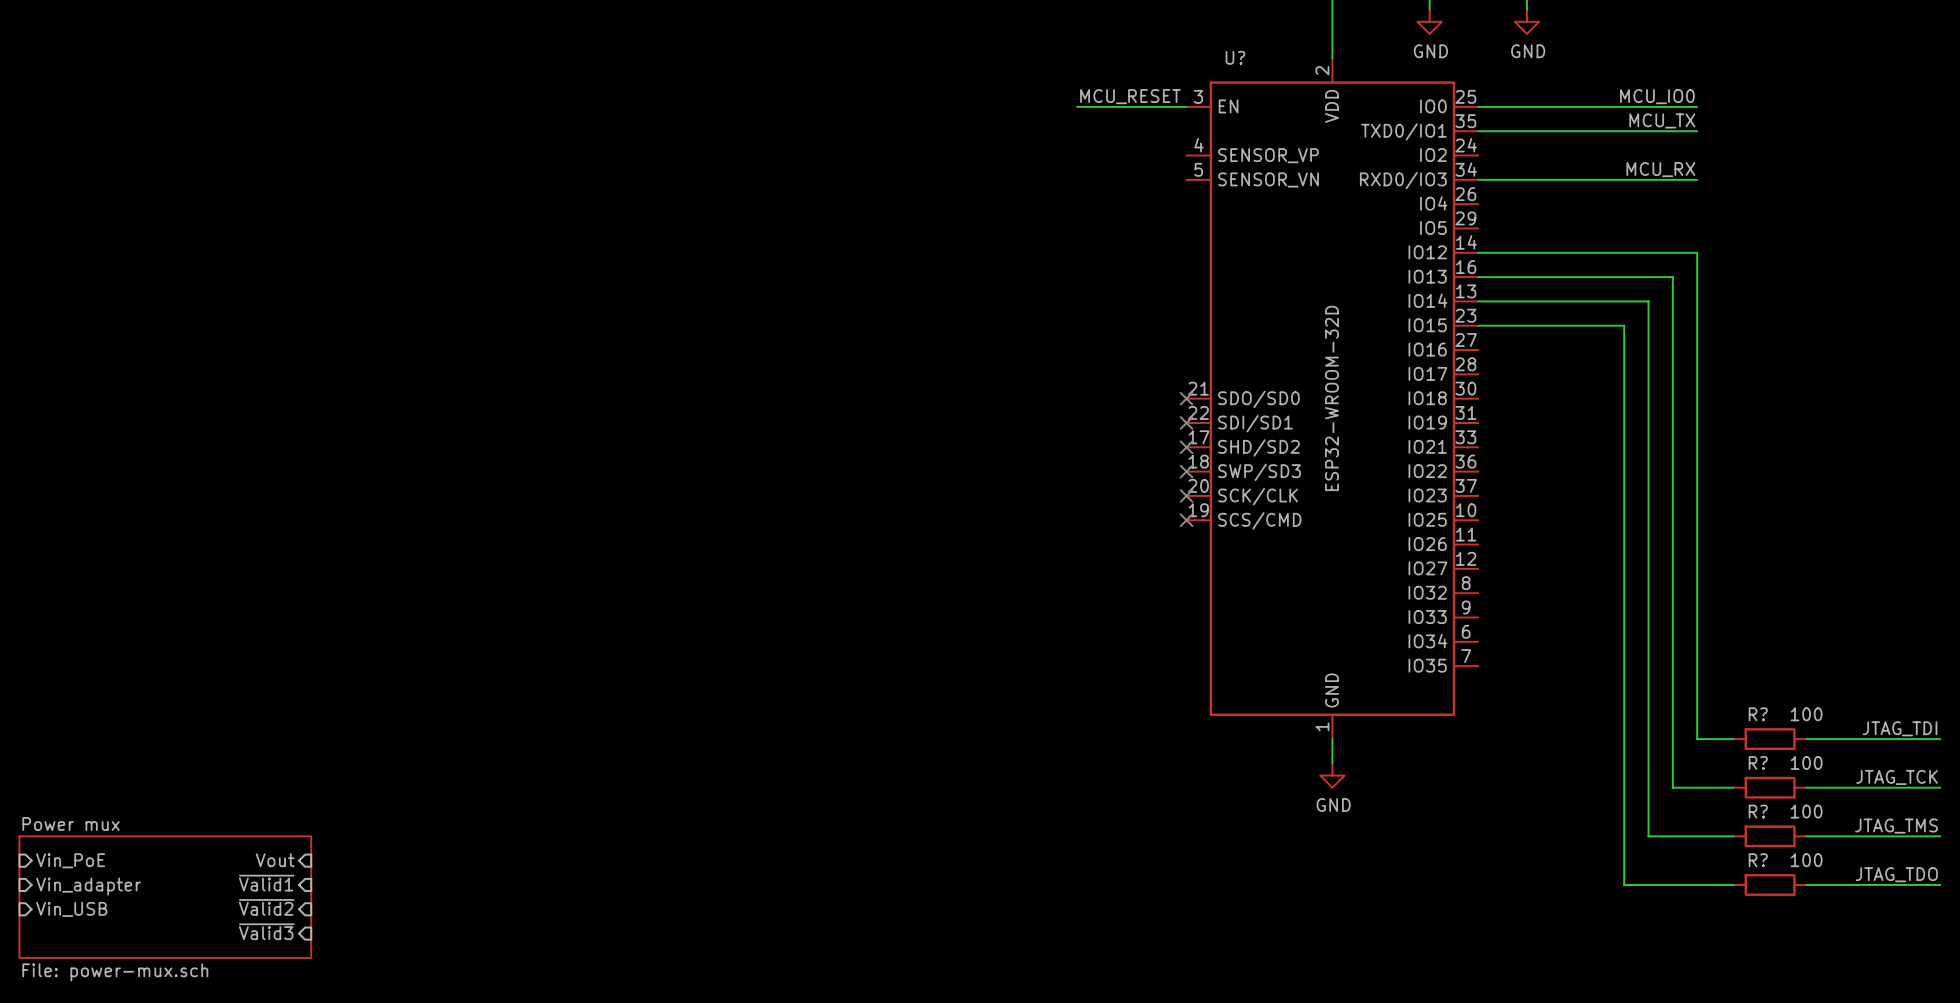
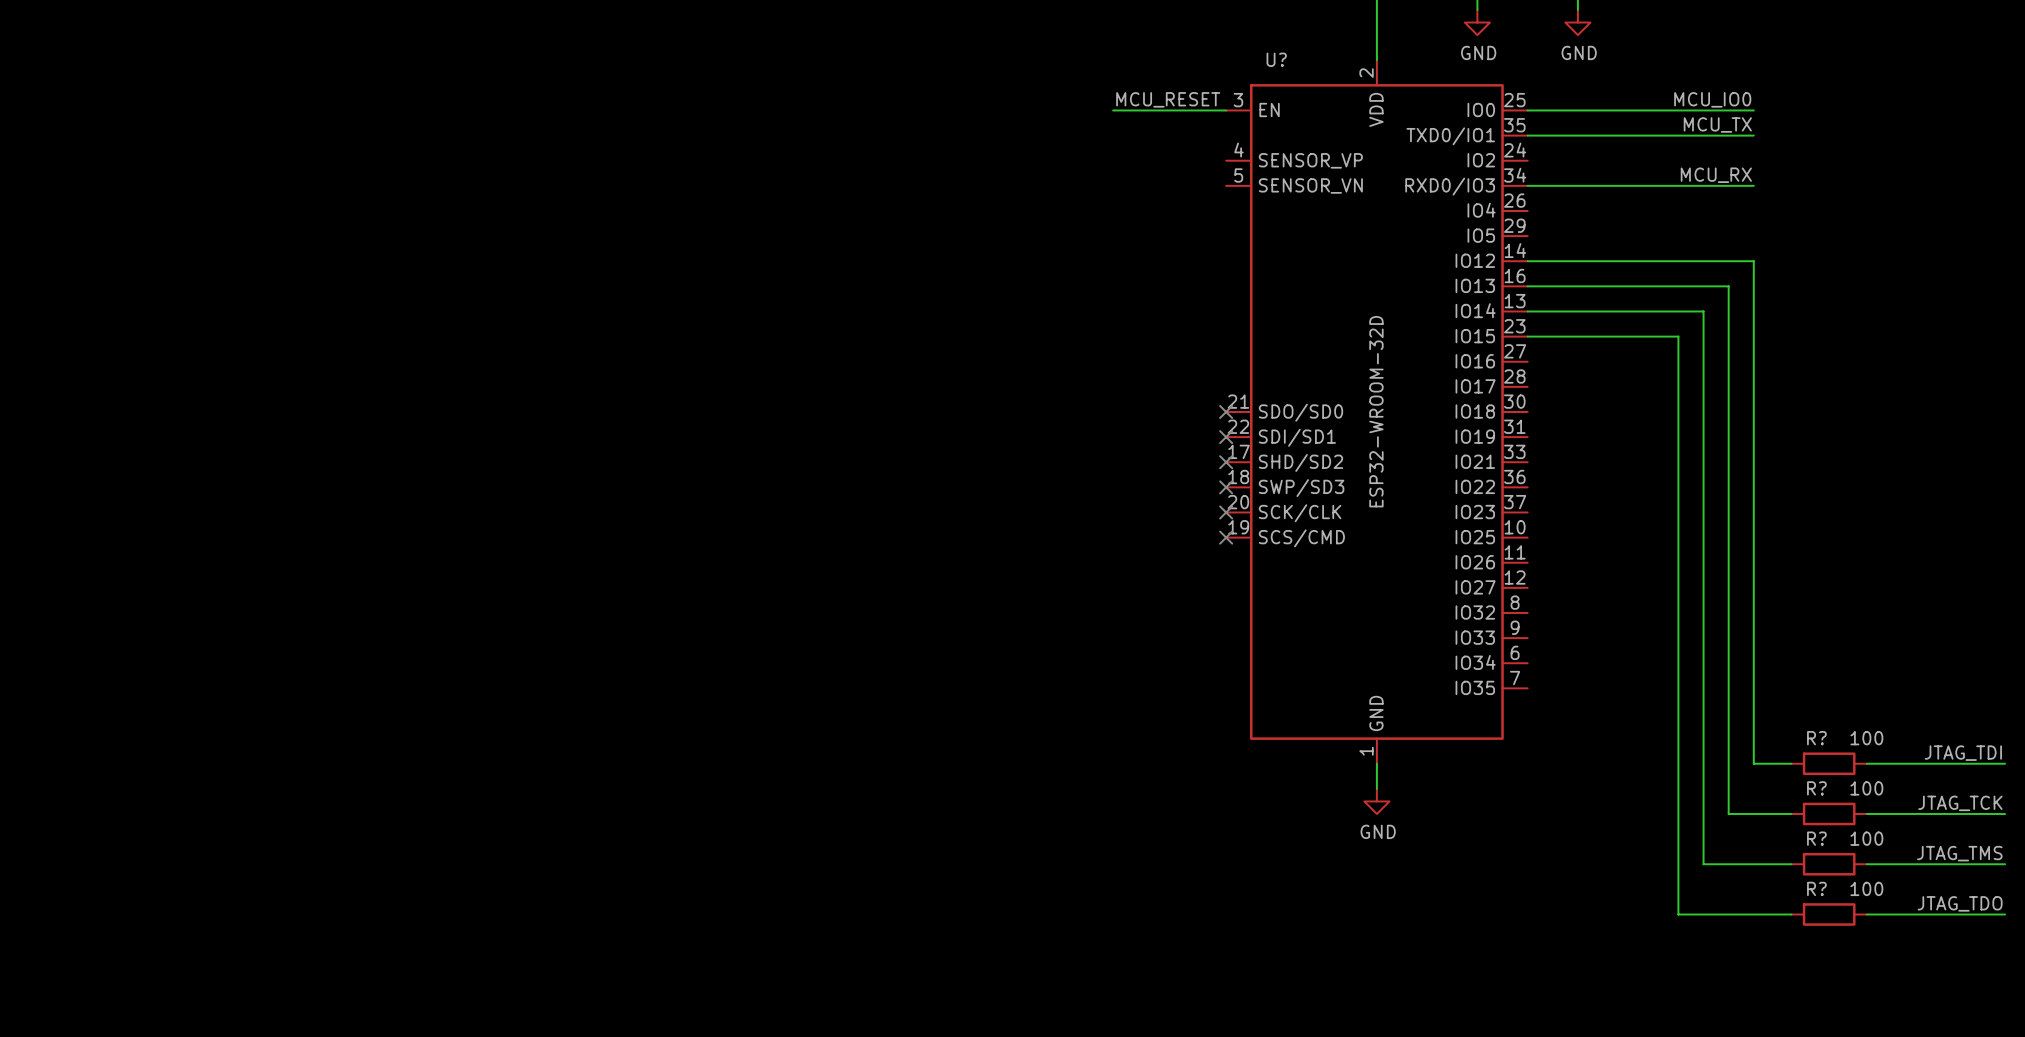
sheet pin: Vin_PoE (70, 860) -> none
sheet pin: Vout (275, 860) -> none
sheet pin: ~{Valid1} (266, 883) -> none
sheet pin: Vin_adapter (88, 886) -> none
sheet Power mux: File: power-mux.sch (165, 897) -> none
sheet pin: ~{Valid2} (266, 907) -> none
sheet pin: Vin_USB (71, 909) -> none
sheet pin: ~{Valid3} (266, 931) -> none

